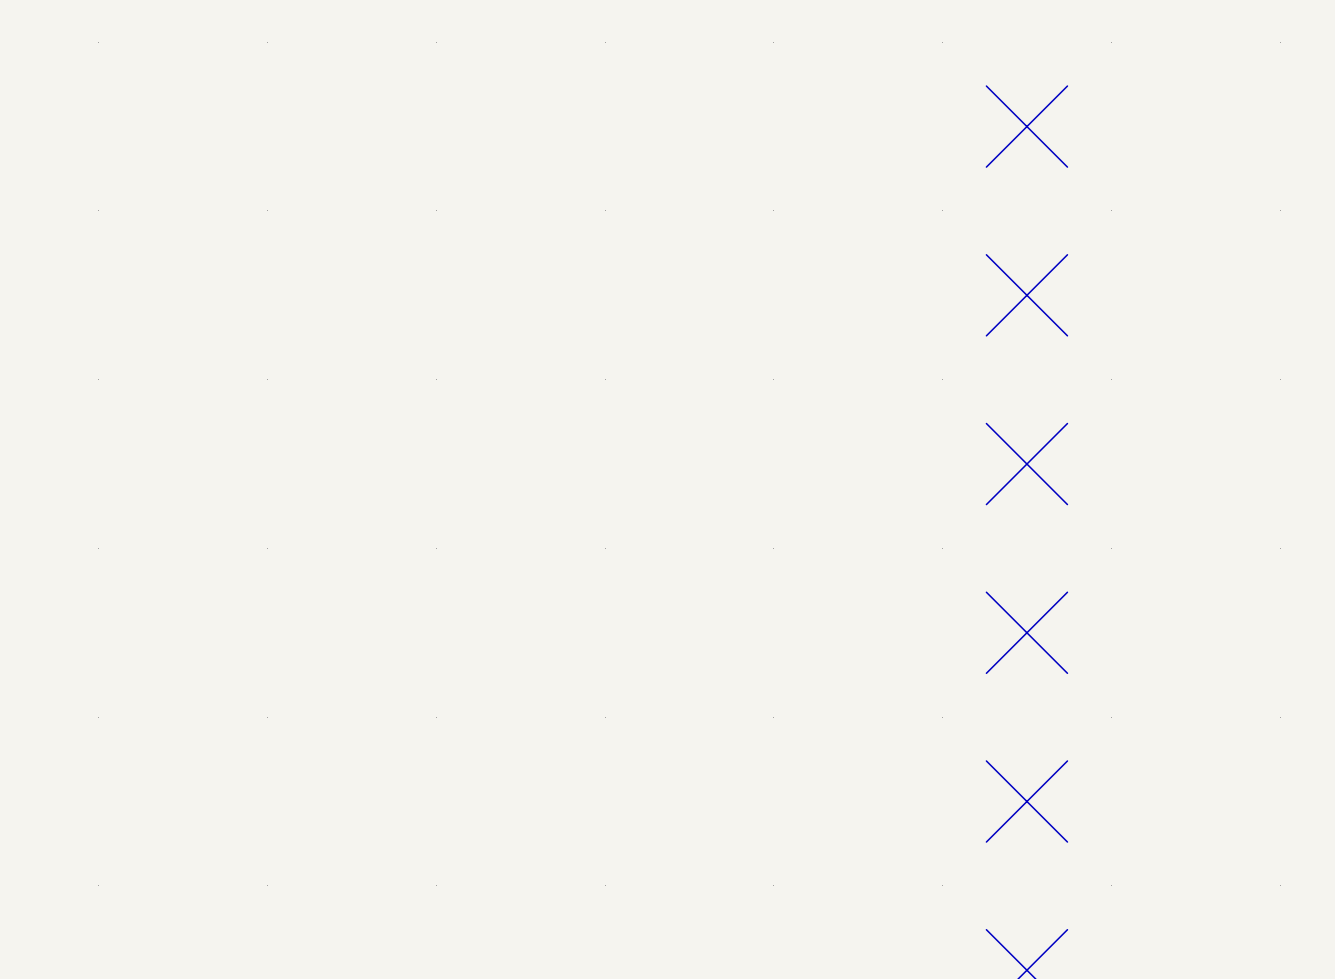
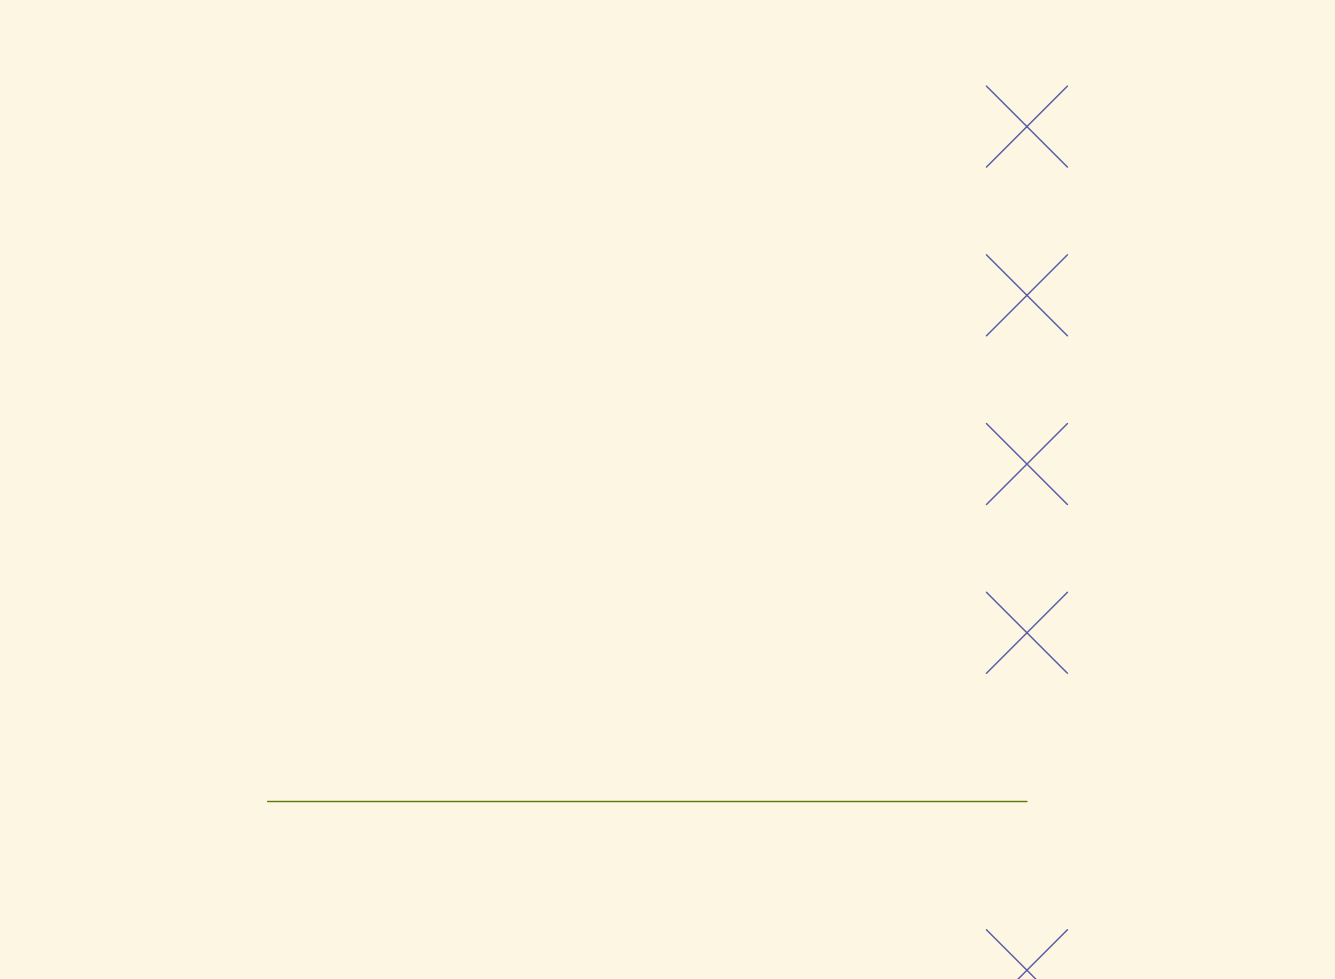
wire: none -> (267, 801) (1026, 801)
no-connect mark: (1026, 801) -> none

